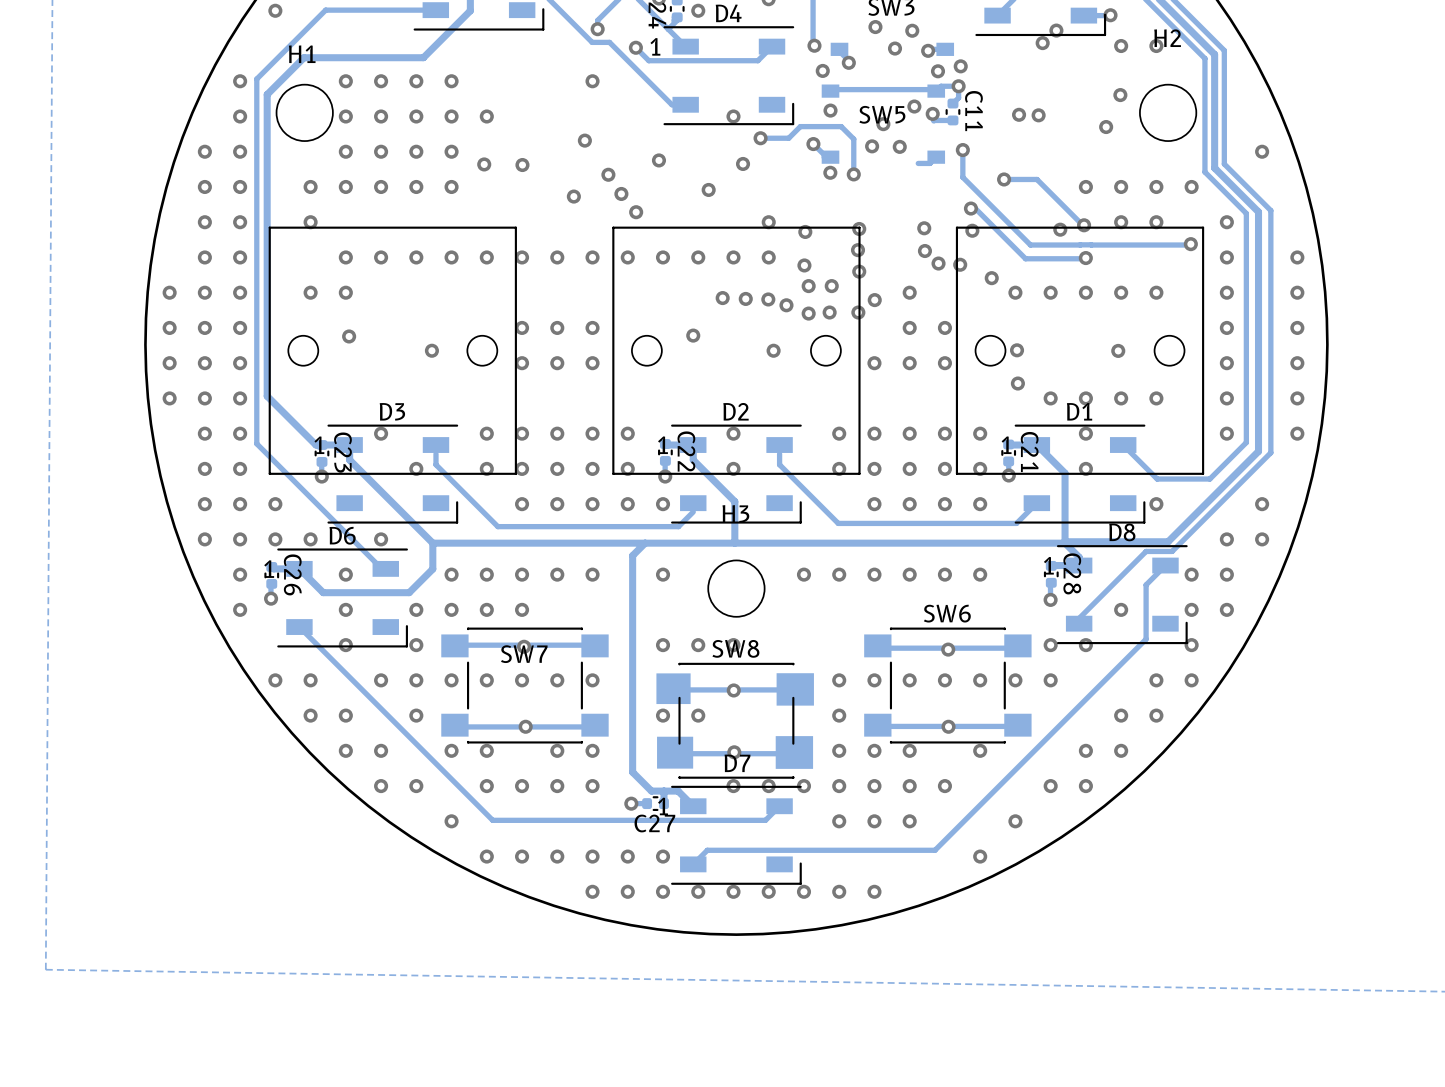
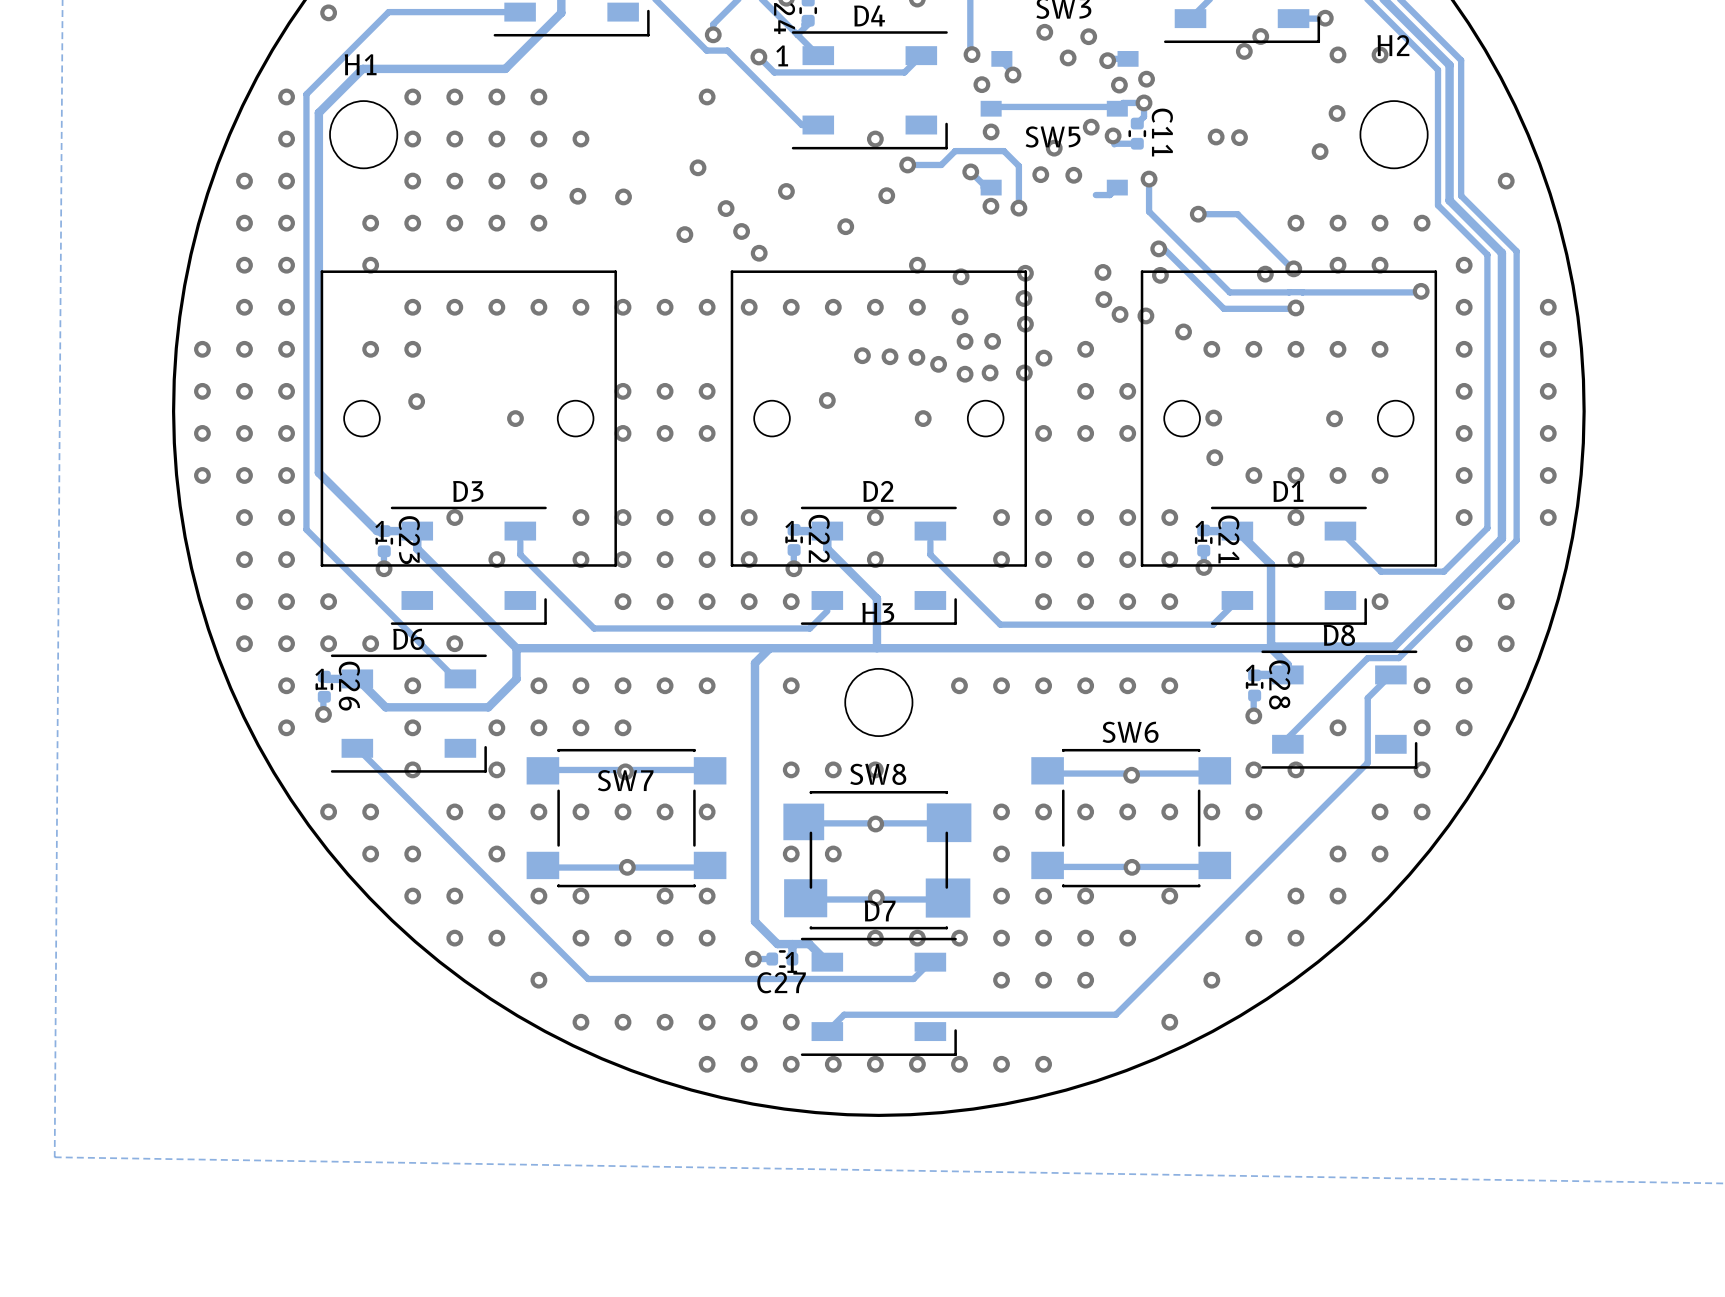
via: (698, 10) -> none

